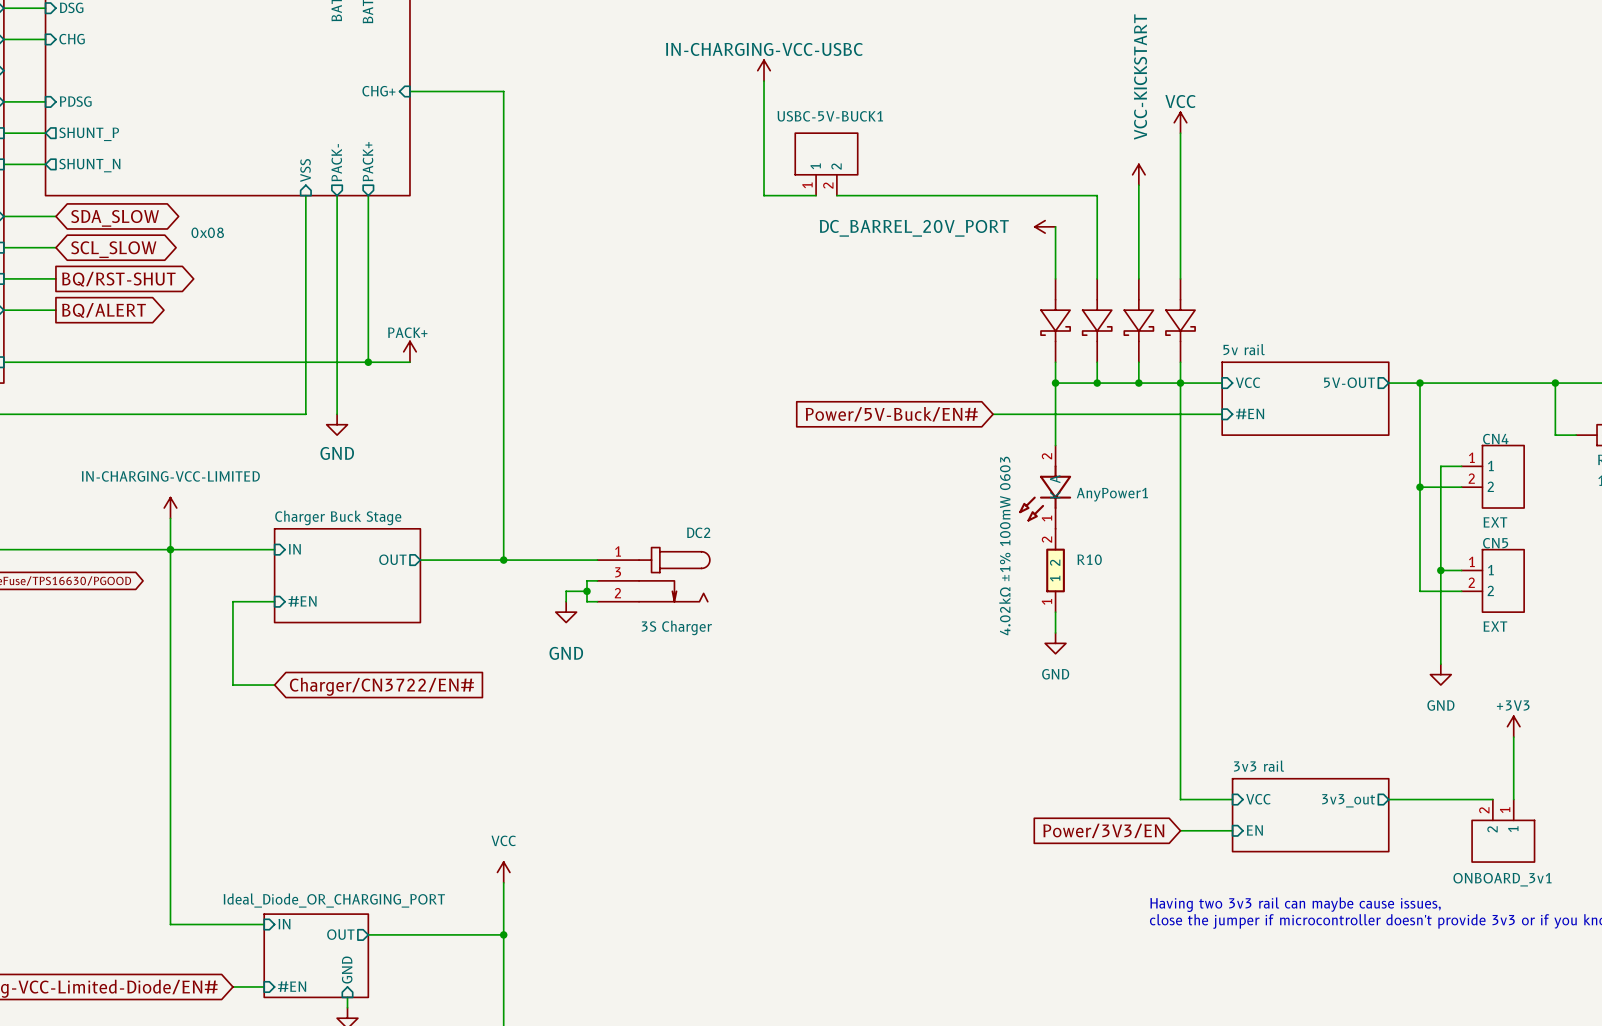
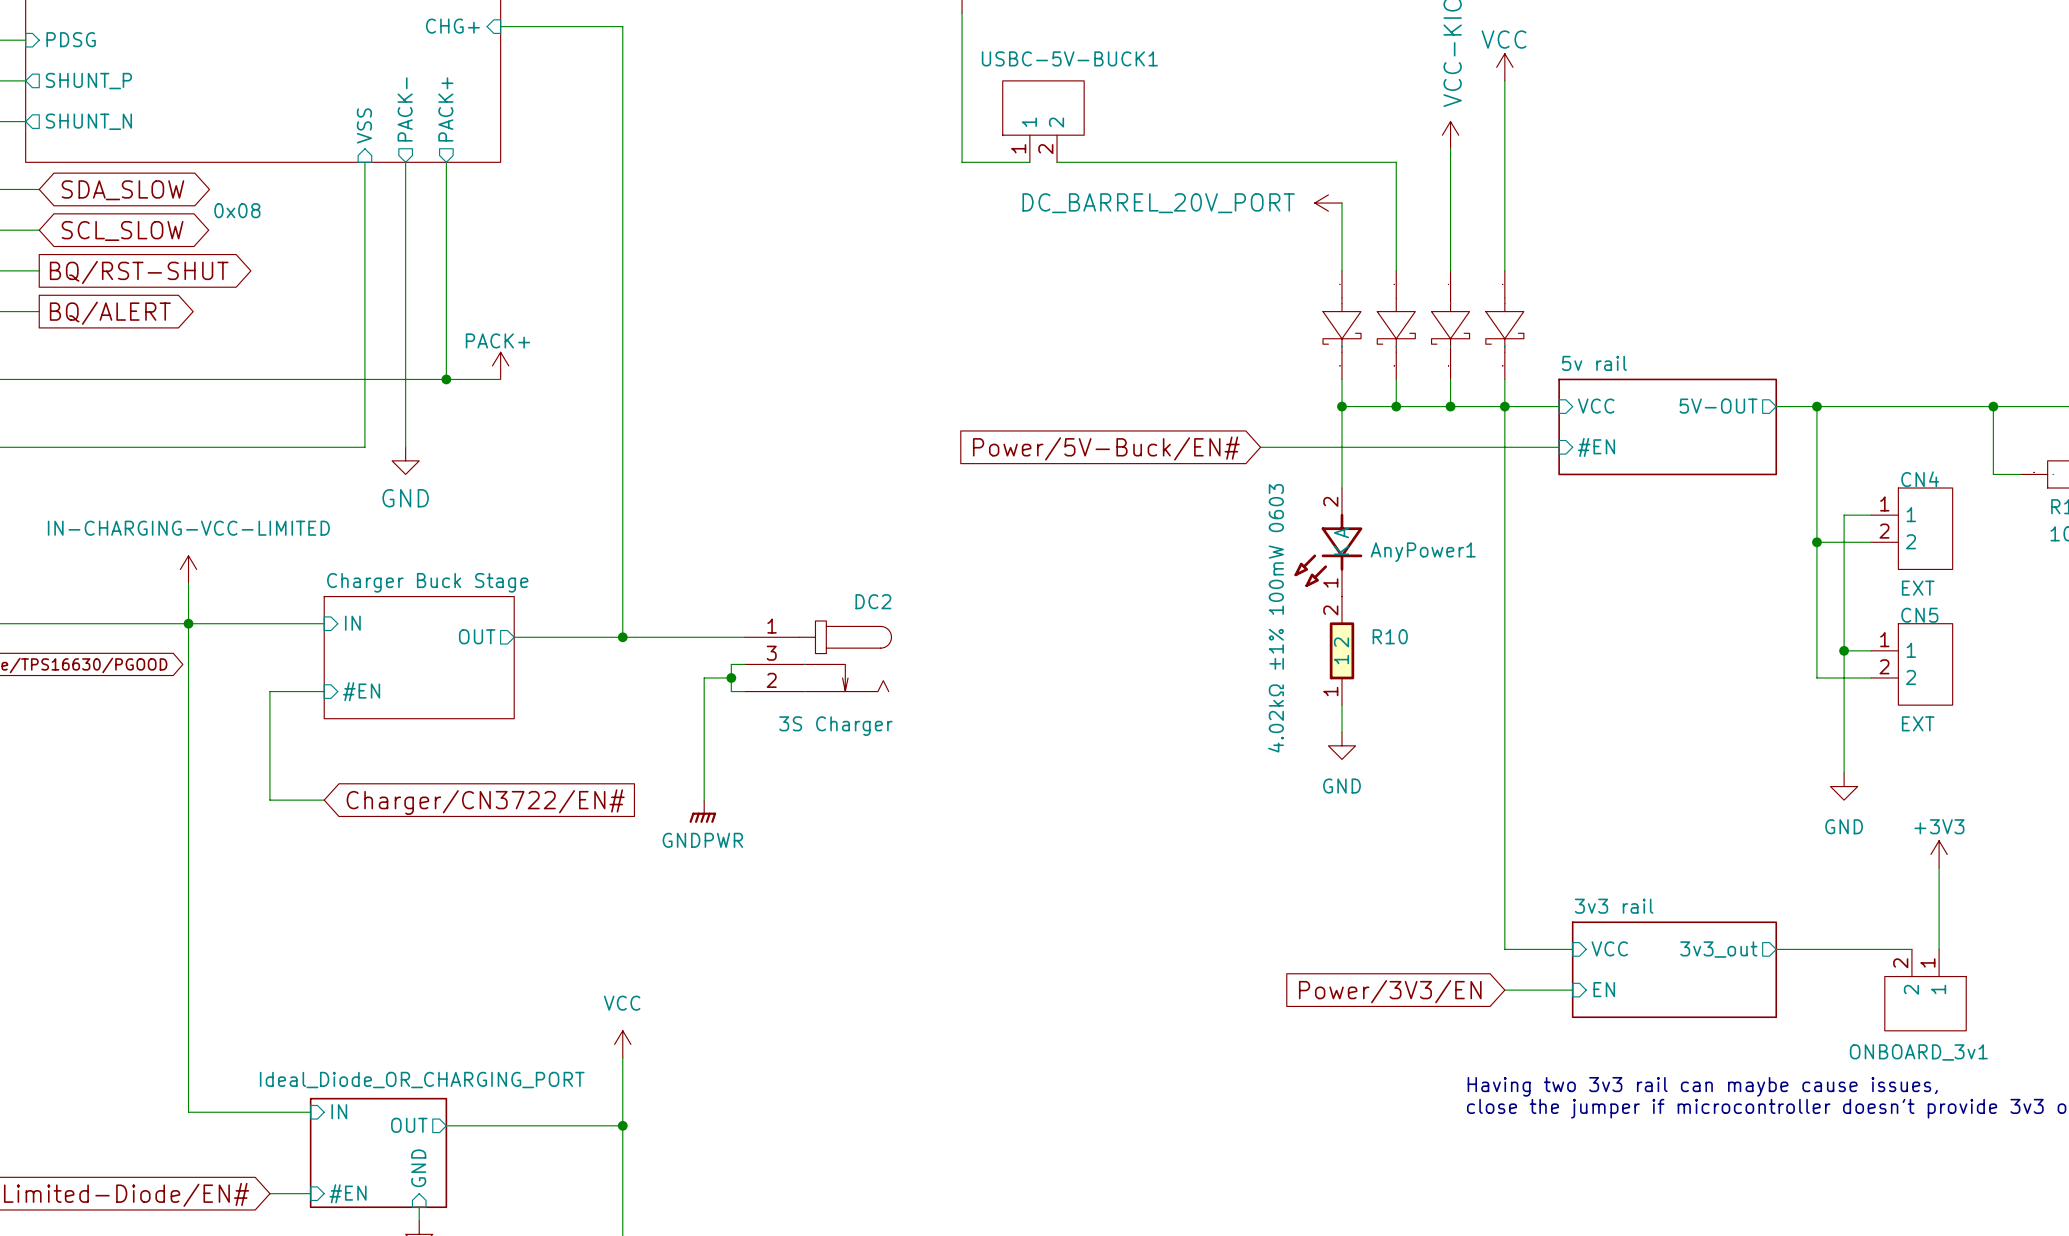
wire: none -> (704, 691) (704, 800)
power symbol: GND (566, 612) -> none
power symbol: none -> GNDPWR (702, 811)

